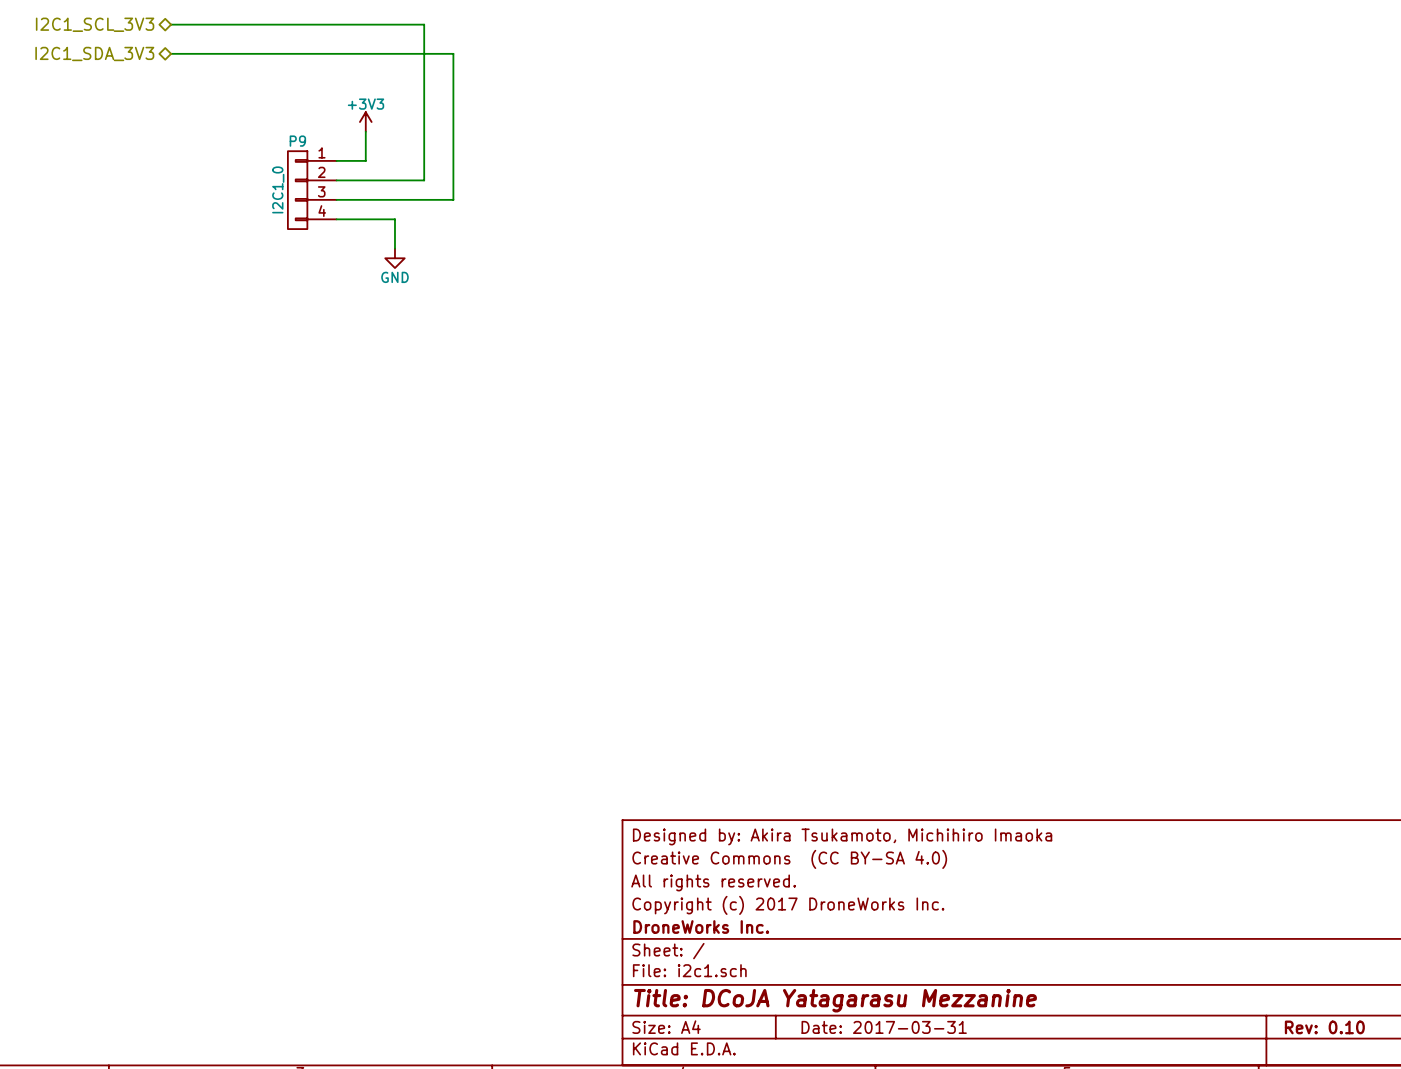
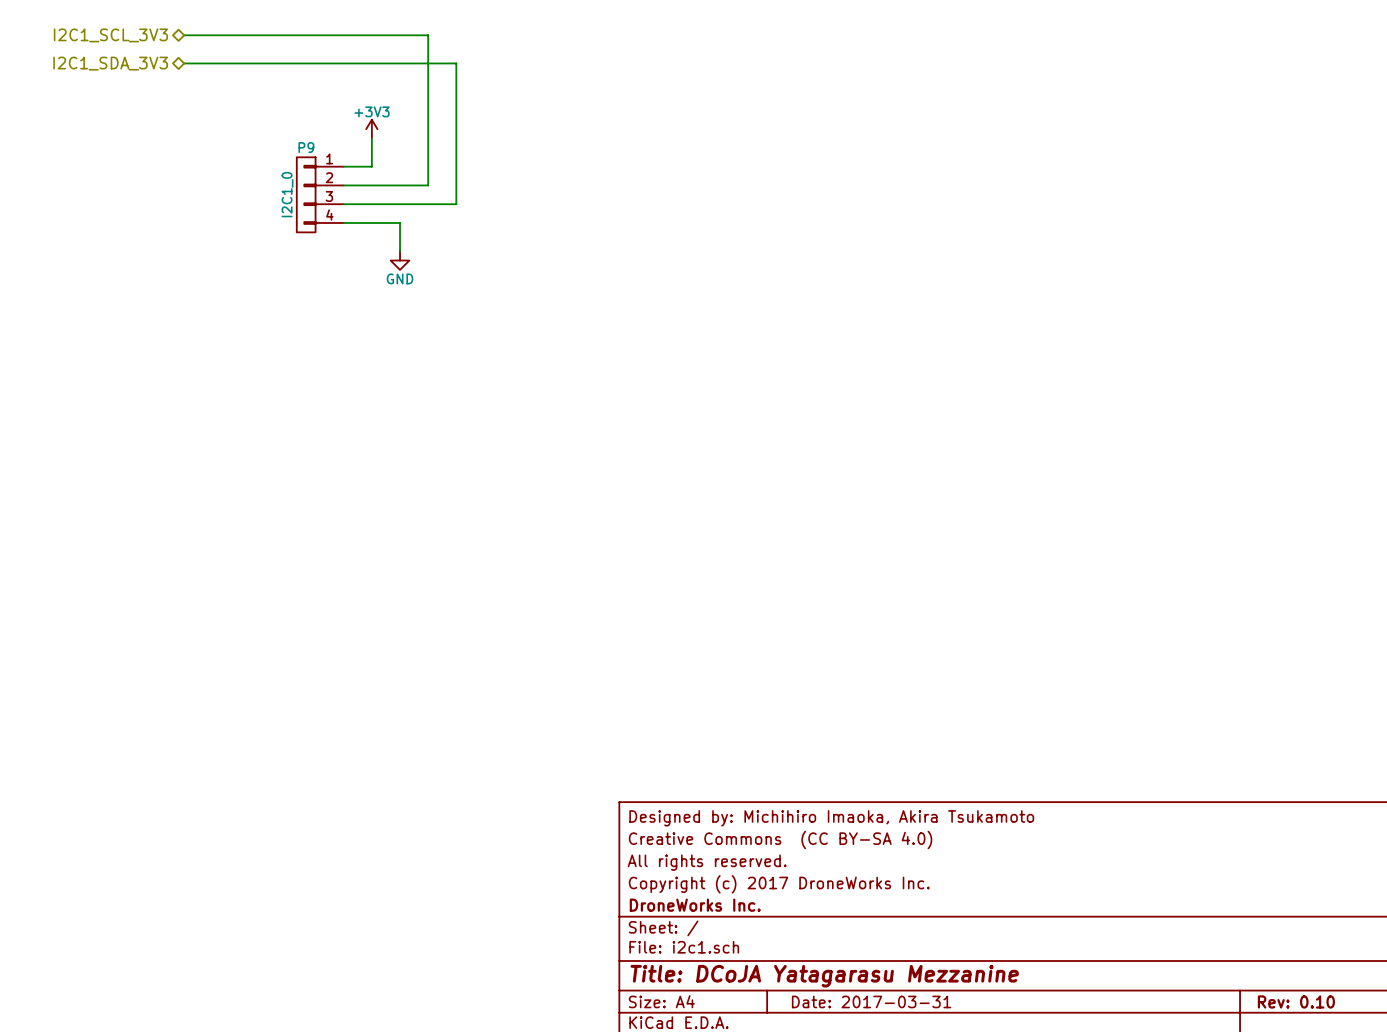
title block: Designed by: Akira Tsukamoto, Michihiro Imaoka (842, 836) -> Designed by: Michihiro Imaoka, Akira Tsukamoto (831, 818)

